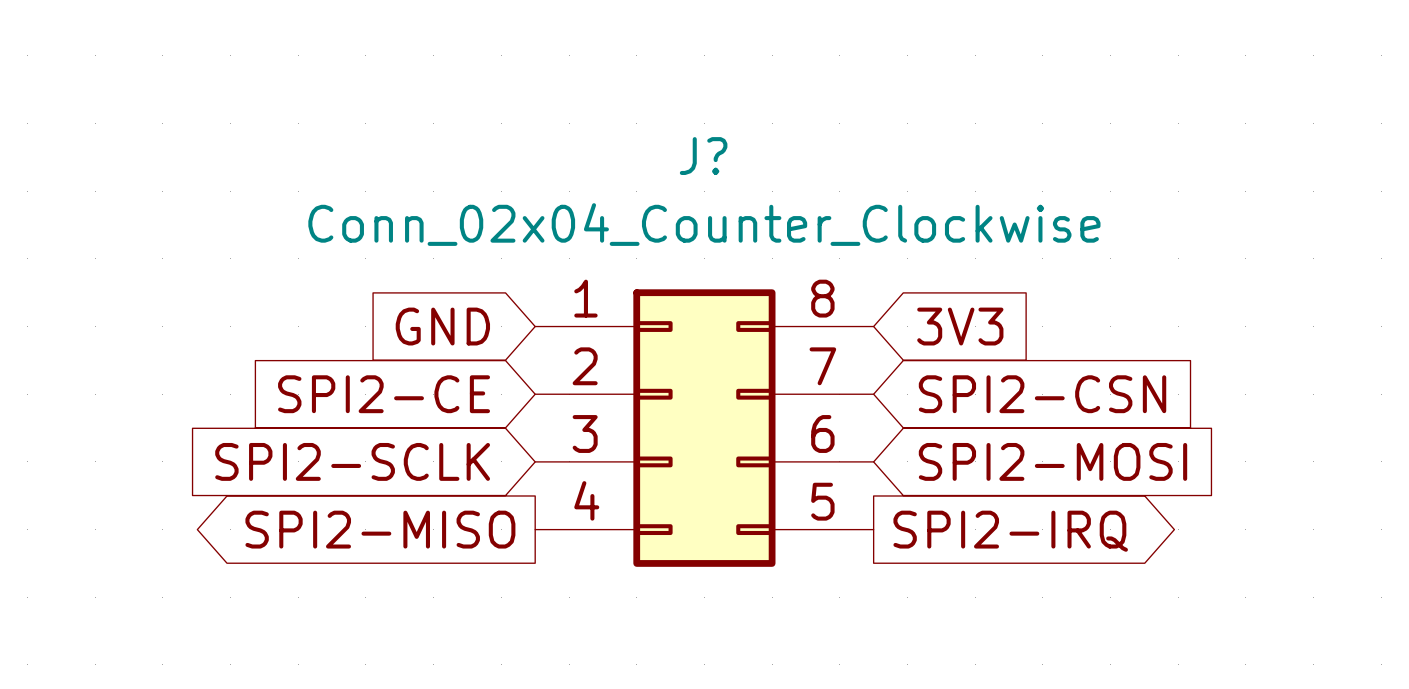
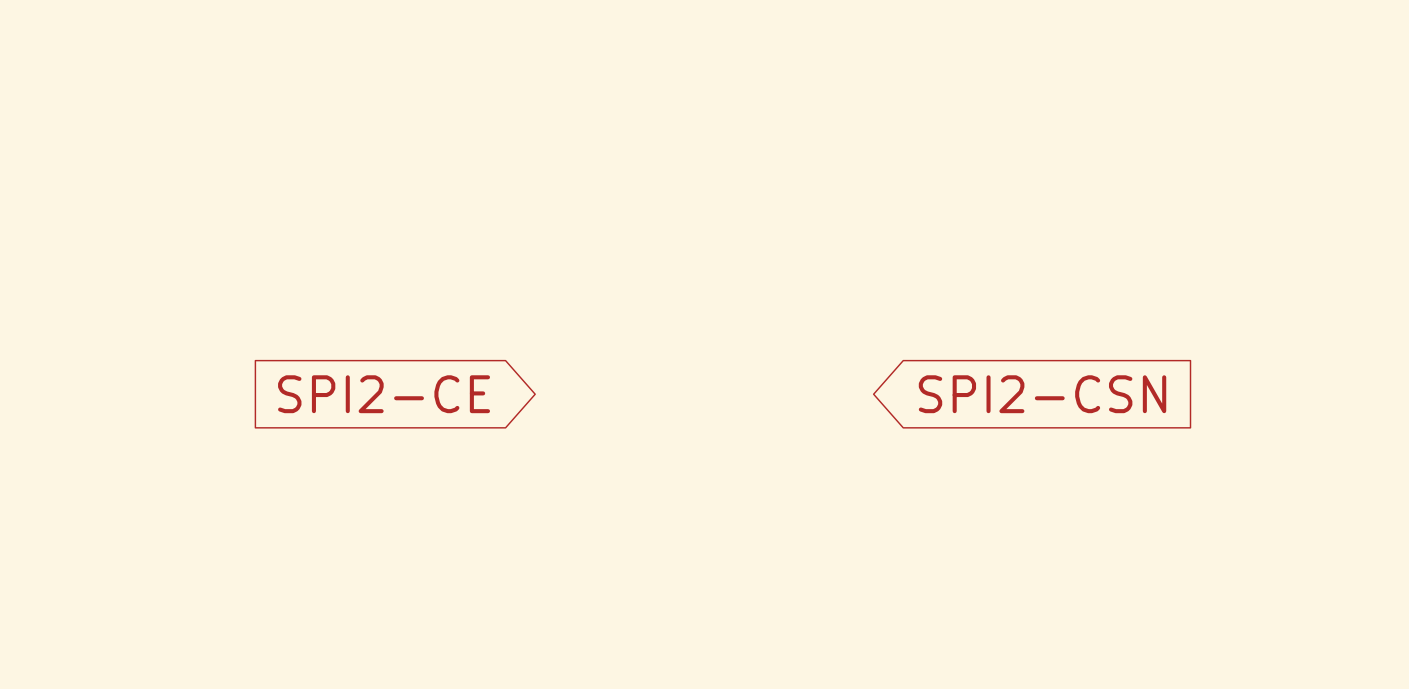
global label: GND (442, 326) -> none
global label: 3V3 (960, 326) -> none
J?: Conn_02x04_Counter_Clockwise (704, 428) -> none
global label: SPI2-SCLK (352, 461) -> none
global label: SPI2-MOSI (1052, 461) -> none
global label: SPI2-MISO (380, 529) -> none
global label: SPI2-IRQ (1010, 531) -> none

